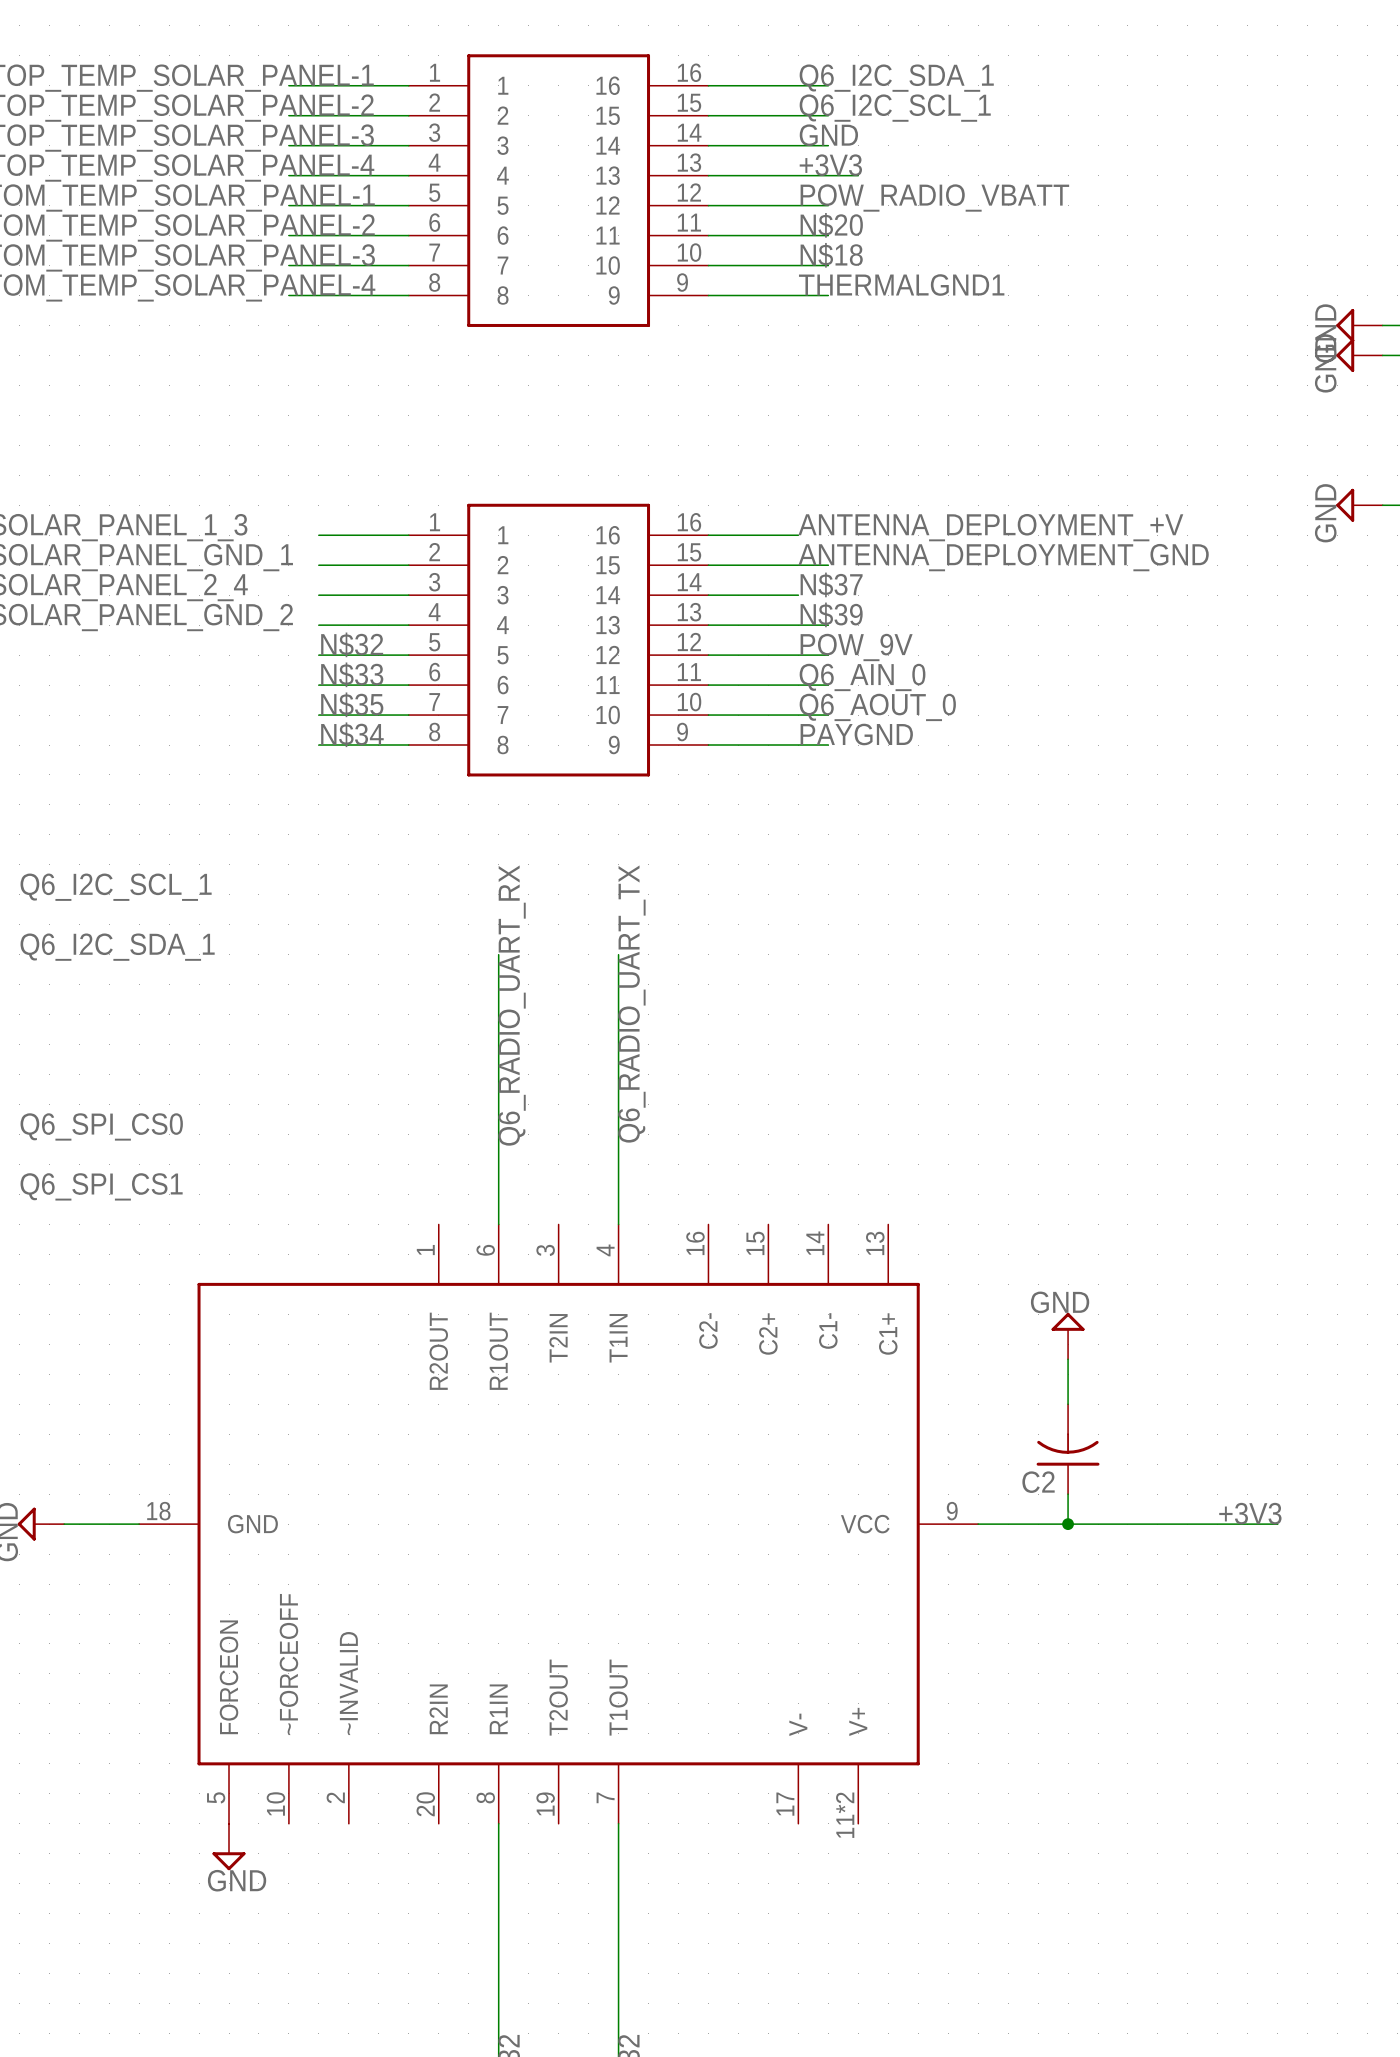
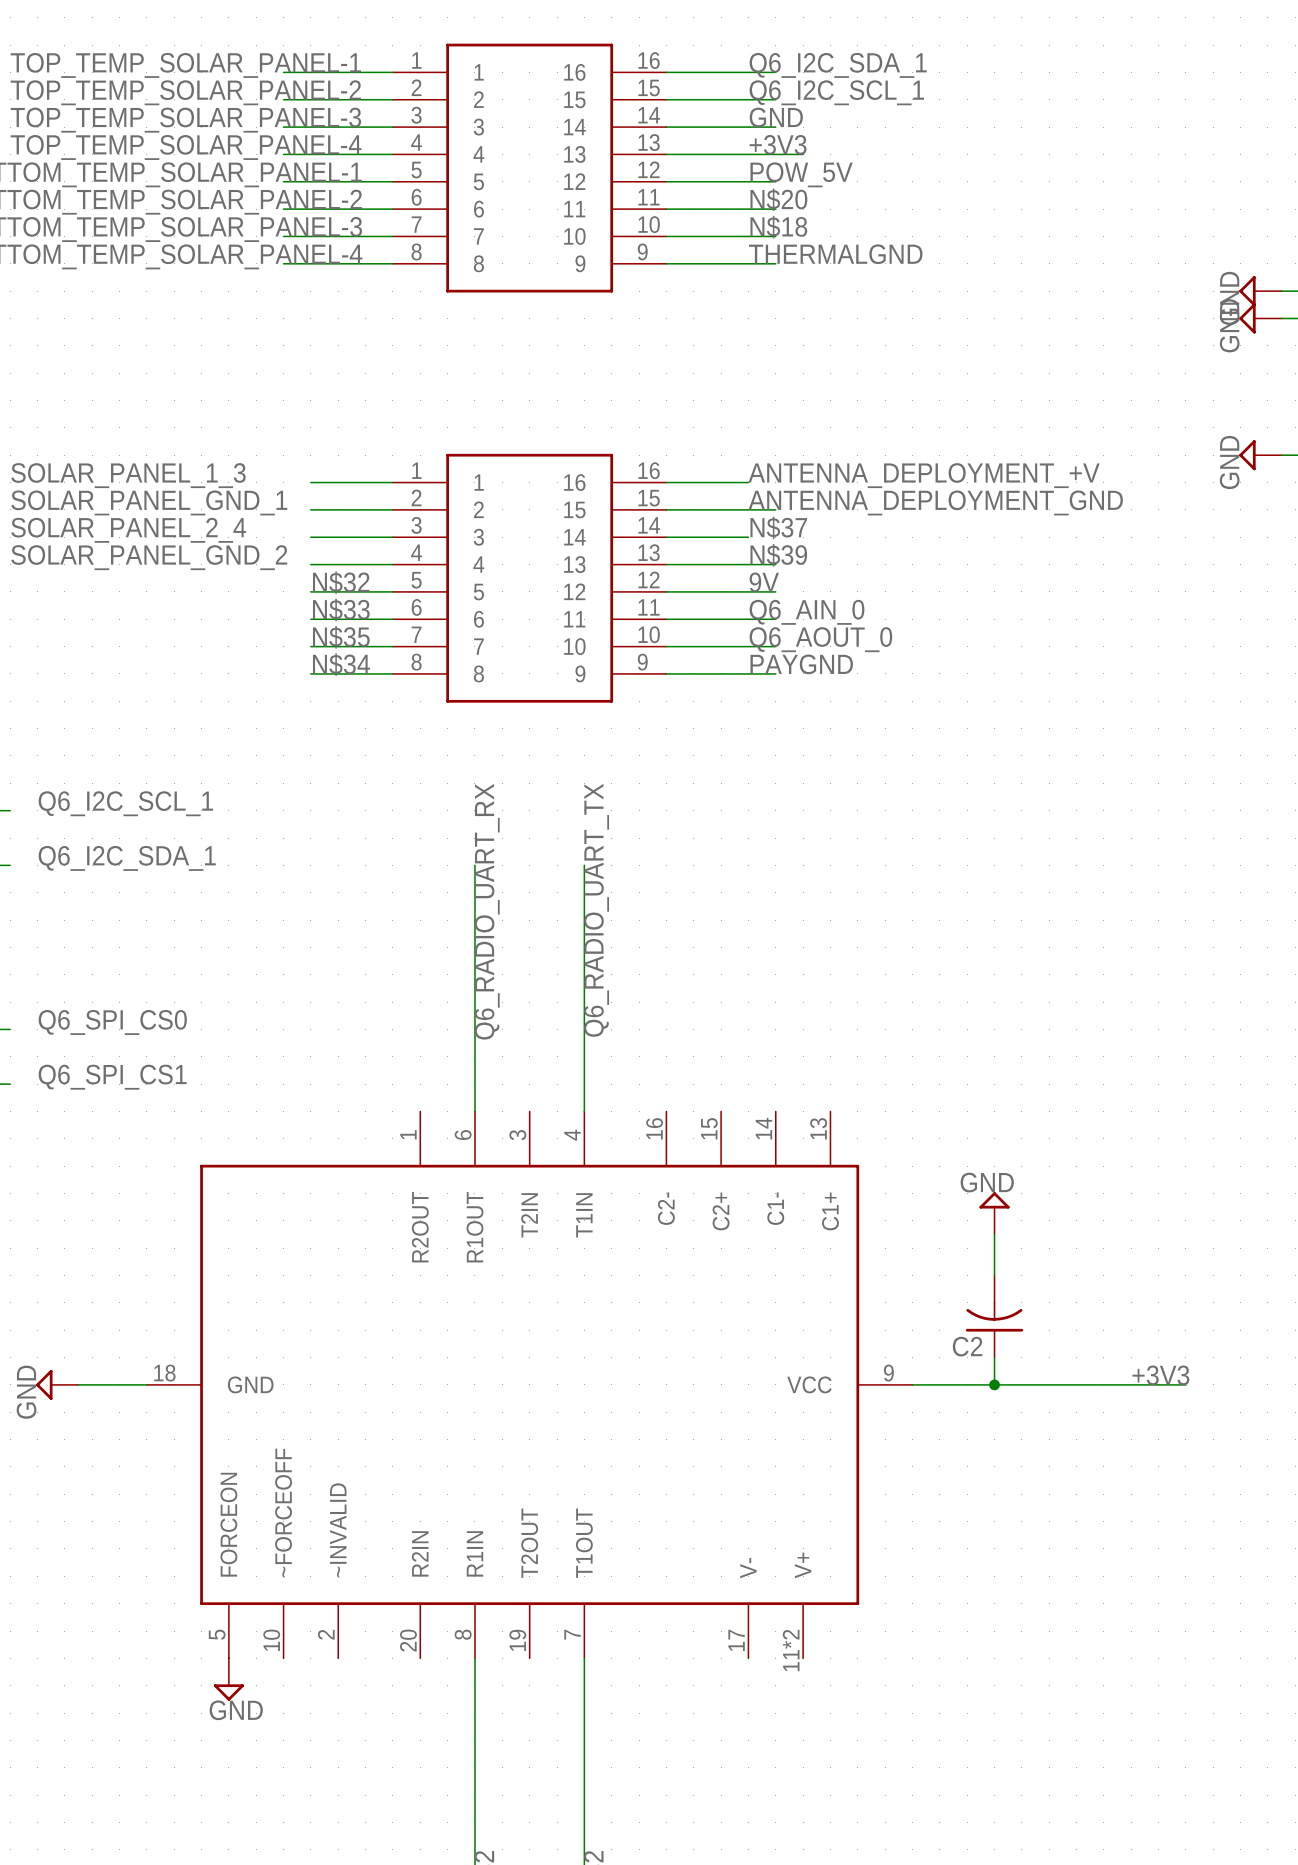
label: POW_RADIO_VBATT (934, 197) -> POW_5V (801, 174)
label: THERMALGND1 (901, 285) -> THERMALGND (835, 254)
label: POW_9V (856, 647) -> 9V (764, 582)

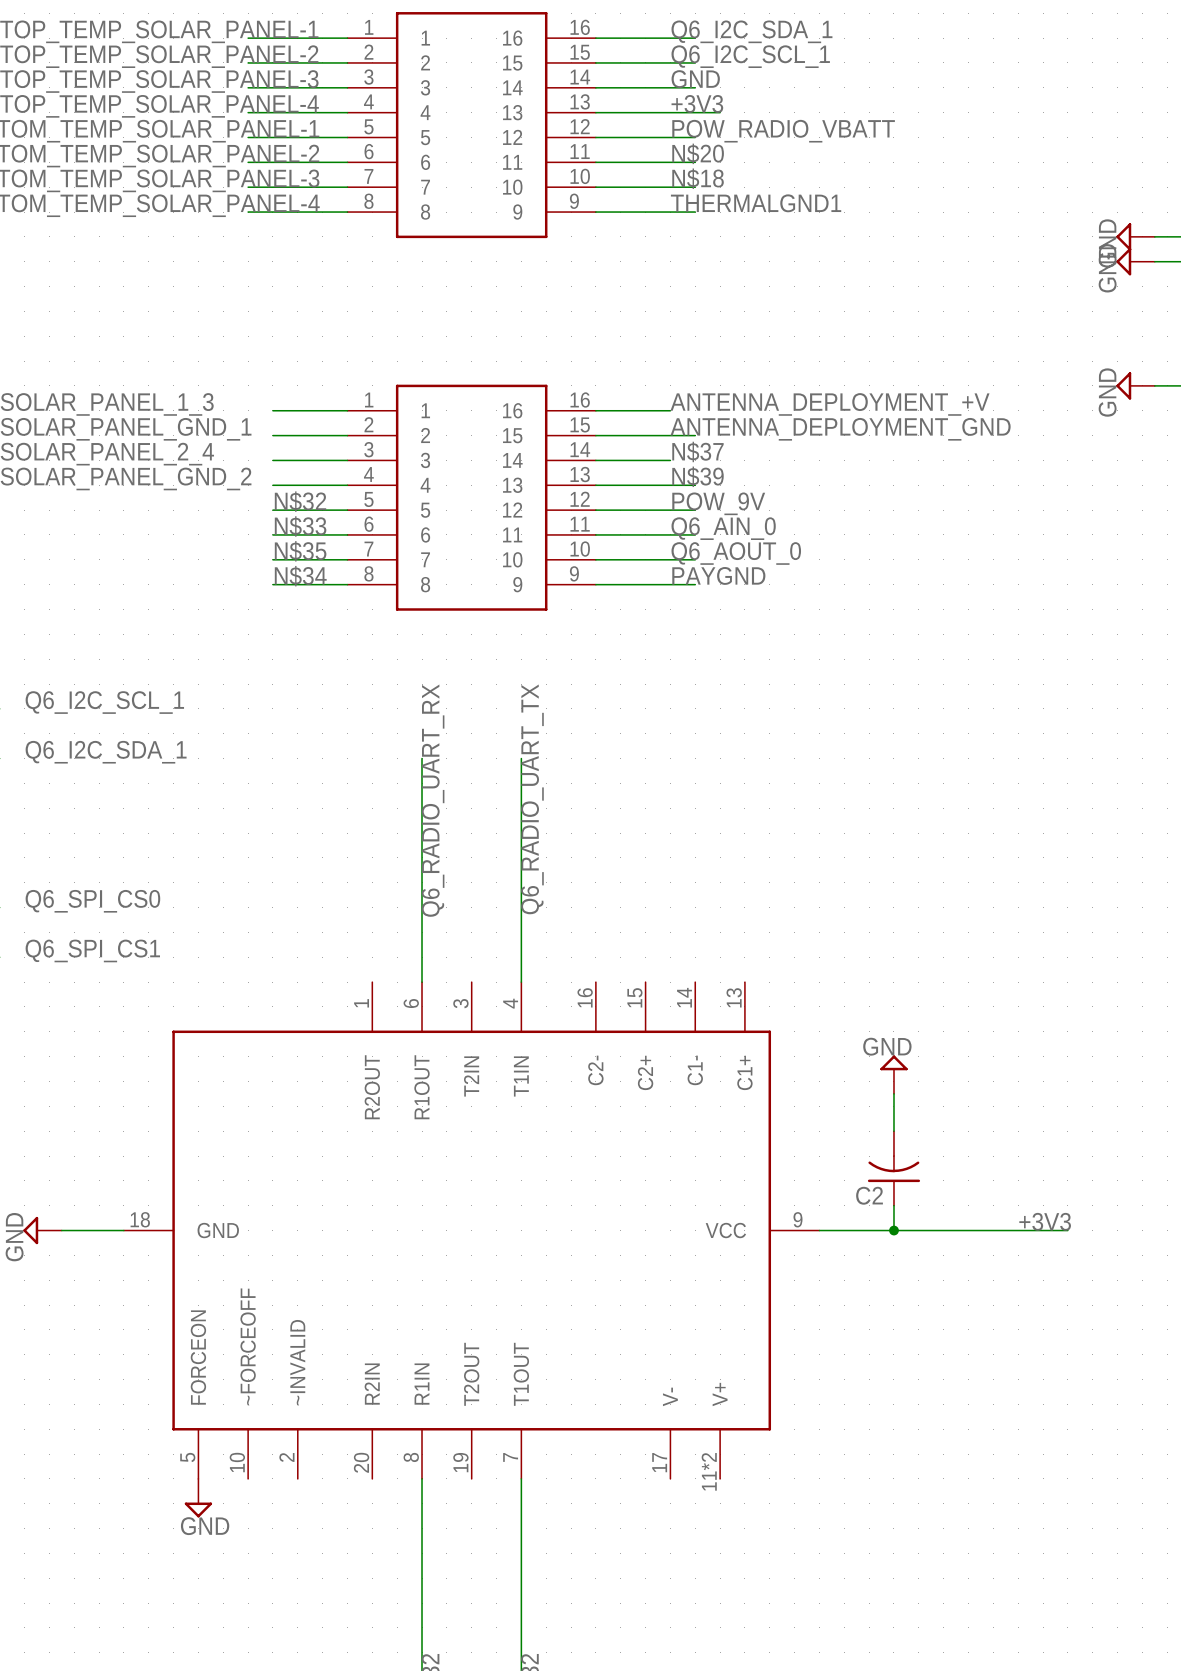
label: POW_5V (801, 174) -> POW_RADIO_VBATT (783, 131)
label: THERMALGND (835, 254) -> THERMALGND1 (756, 203)
label: 9V (764, 582) -> POW_9V (718, 503)

